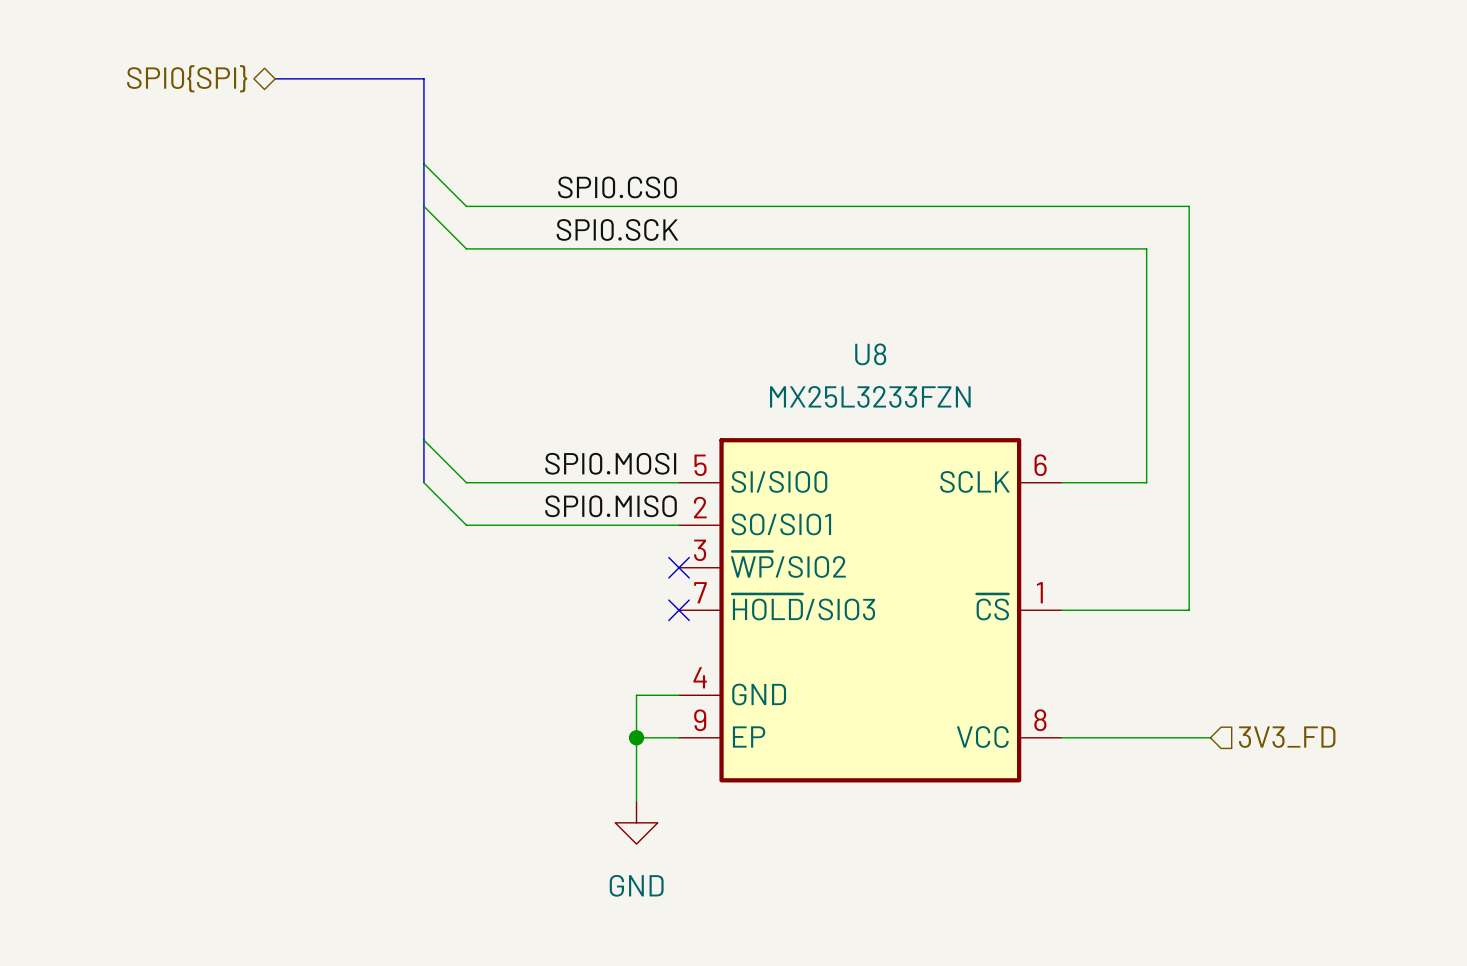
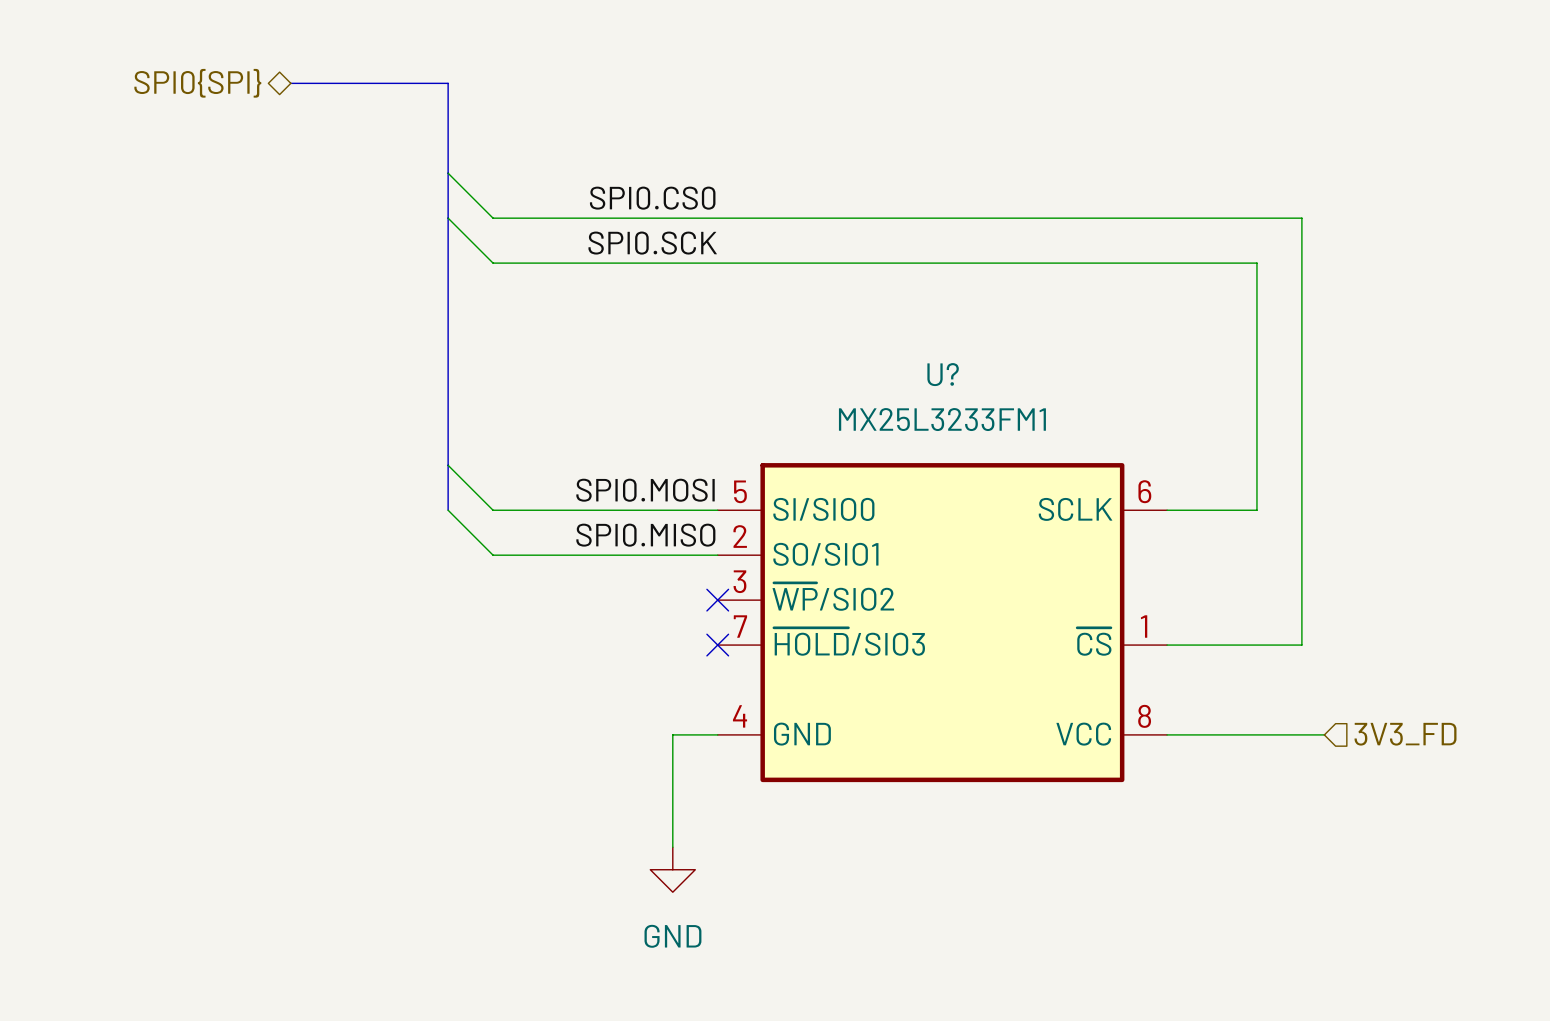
wire: (1189, 206) (1189, 248) -> (1212, 263) (1256, 263)
wire: none -> (1256, 218) (1301, 218) (1301, 645) (1256, 645)
wire: (1146, 248) (1146, 482) -> none
wire: (1189, 482) (1189, 610) -> (1256, 510) (1212, 510)
U?: none -> MX25L3233FM1 (942, 622)
U8: MX25L3233FZN (870, 610) -> none
wire: (636, 737) (679, 737) -> none
junction: (636, 737) -> none
wire: (1061, 737) (1210, 737) -> (1167, 734) (1324, 734)
hierarchical label position: 3V3_FD (1287, 737) -> 3V3_FD (1405, 734)

